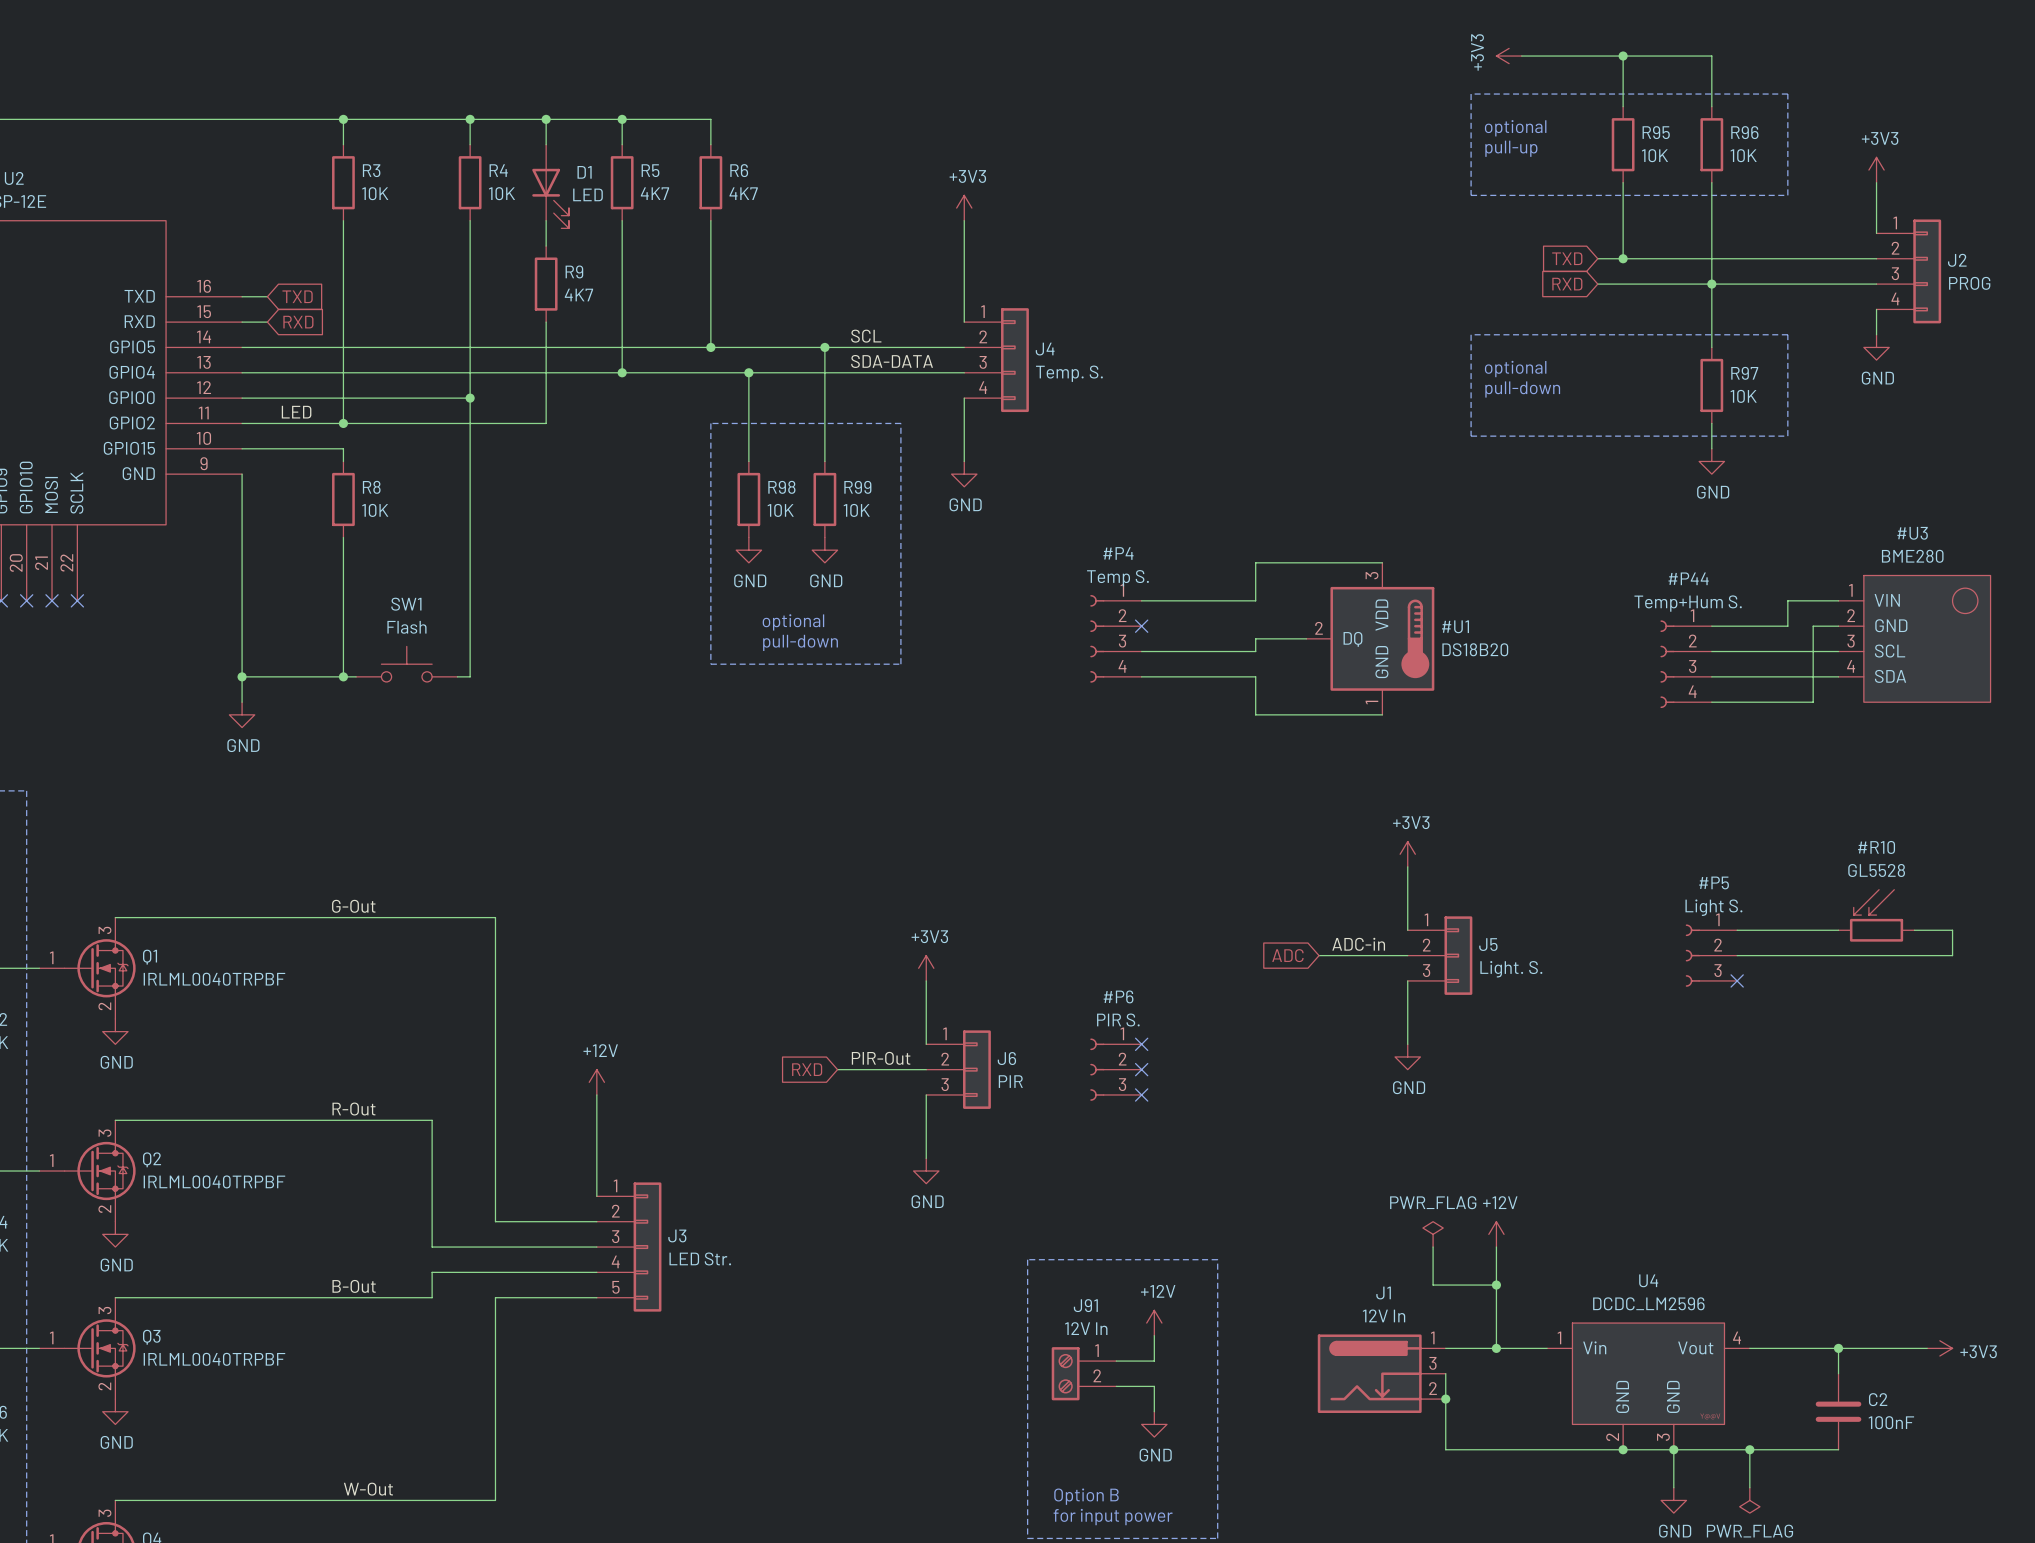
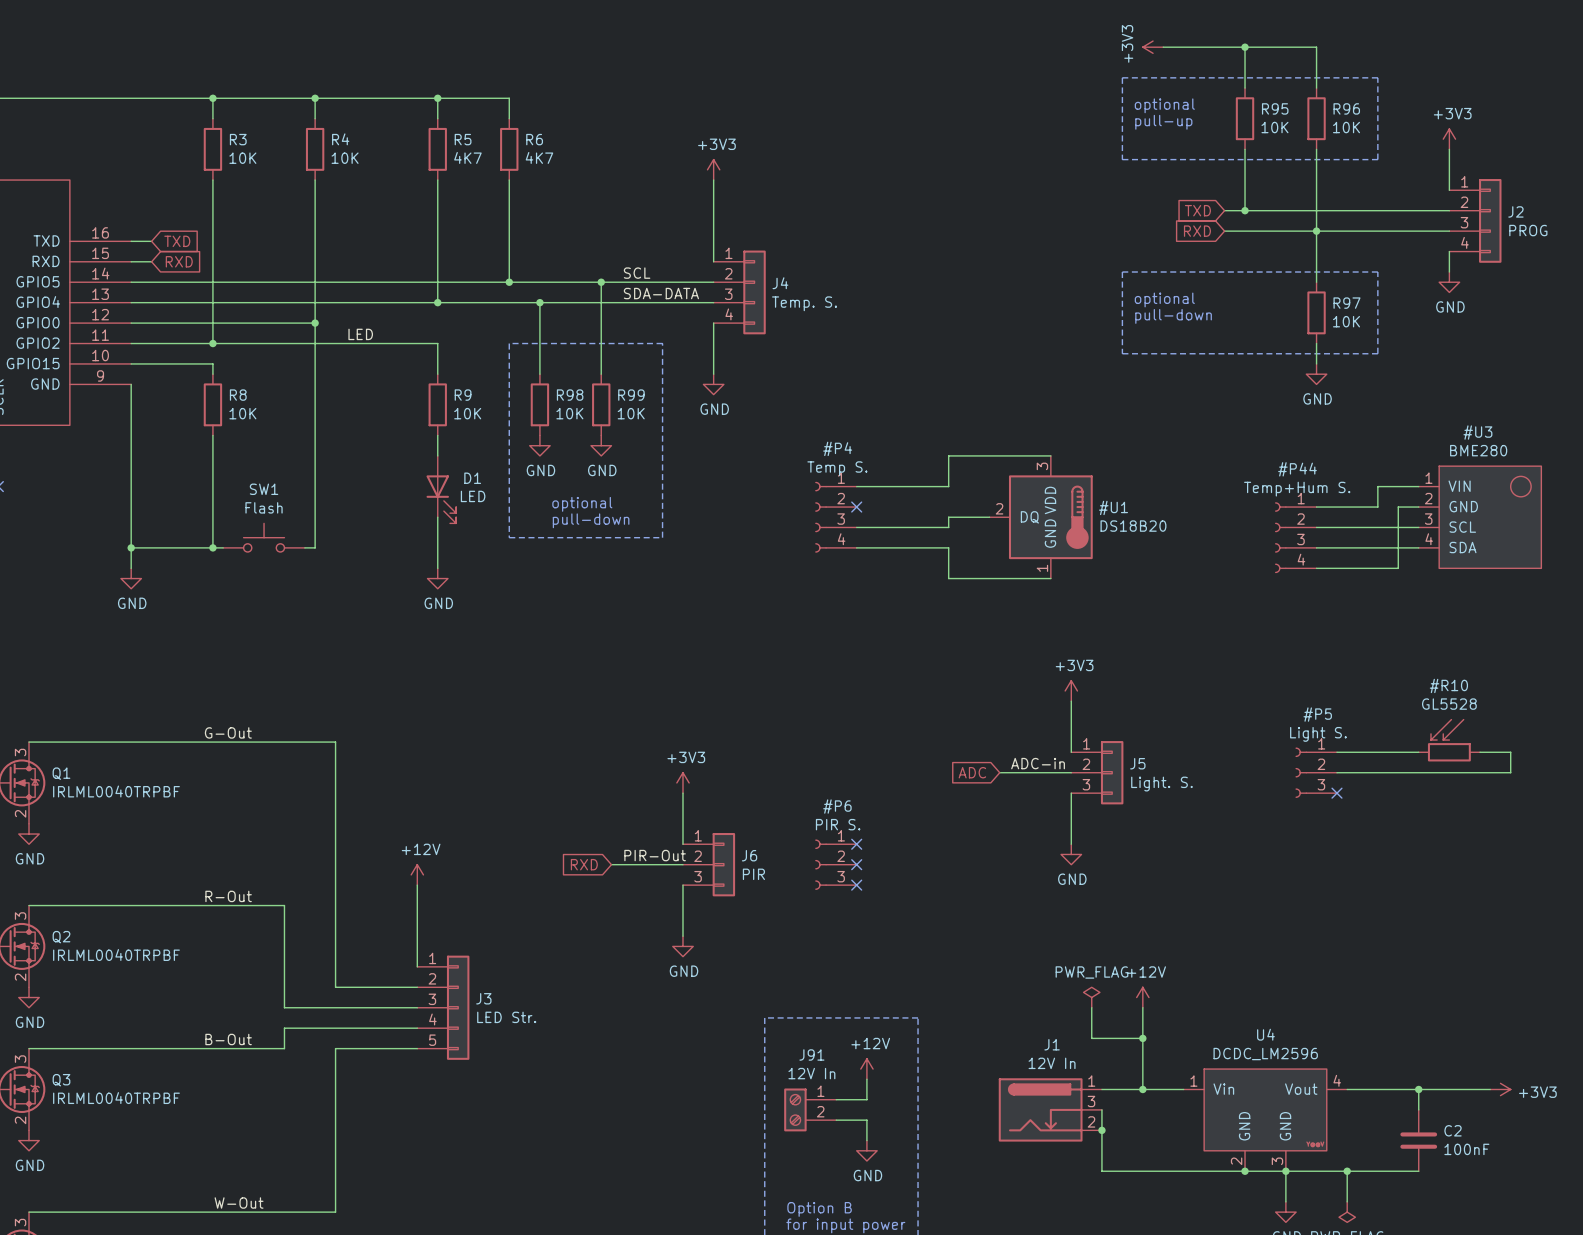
wire: (546, 119) (546, 144) -> none
junction: (546, 119) -> none
D1 position: (550, 186) -> (441, 489)
wire: (546, 220) (546, 246) -> none
R9 position: (546, 284) -> (437, 404)
R9 value: 4K7 (578, 295) -> 10K (467, 413)
wire: (546, 322) (546, 423) -> (437, 374) (437, 343) (376, 343)
label position: LED (296, 412) -> LED (360, 334)
wire: none -> (437, 435) (437, 455)
wire: none -> (437, 517) (437, 568)
power symbol: none -> GND (437, 578)

